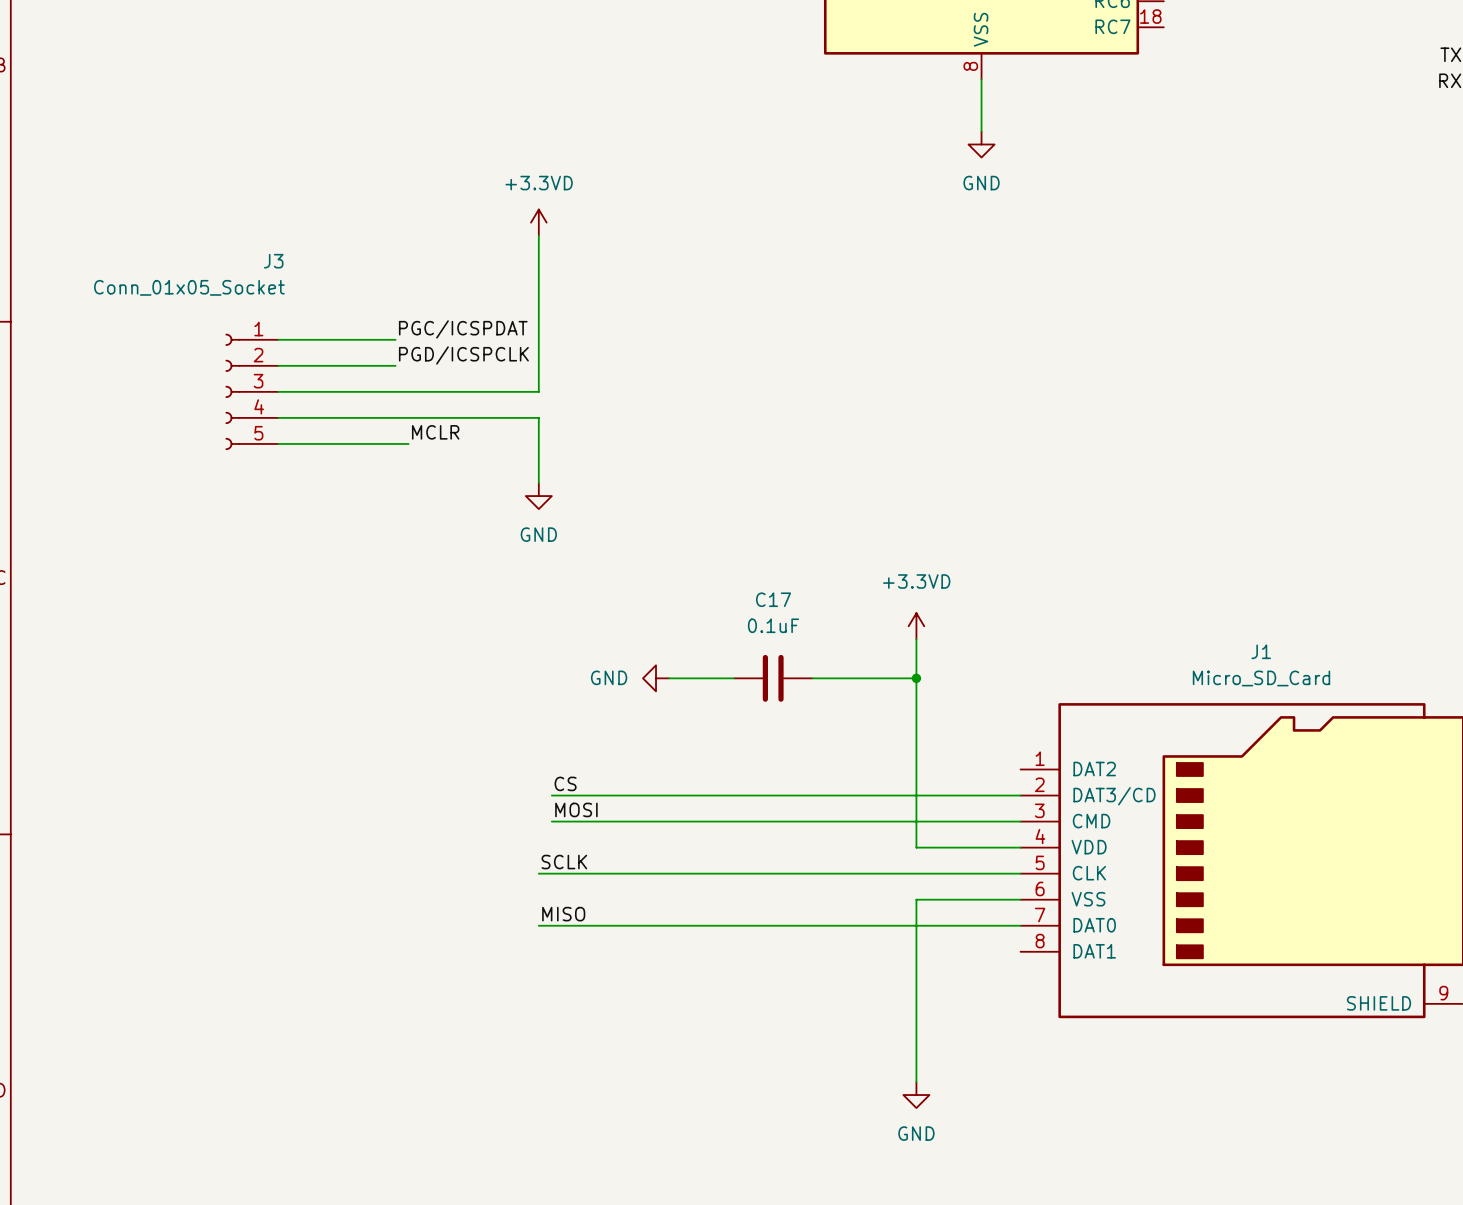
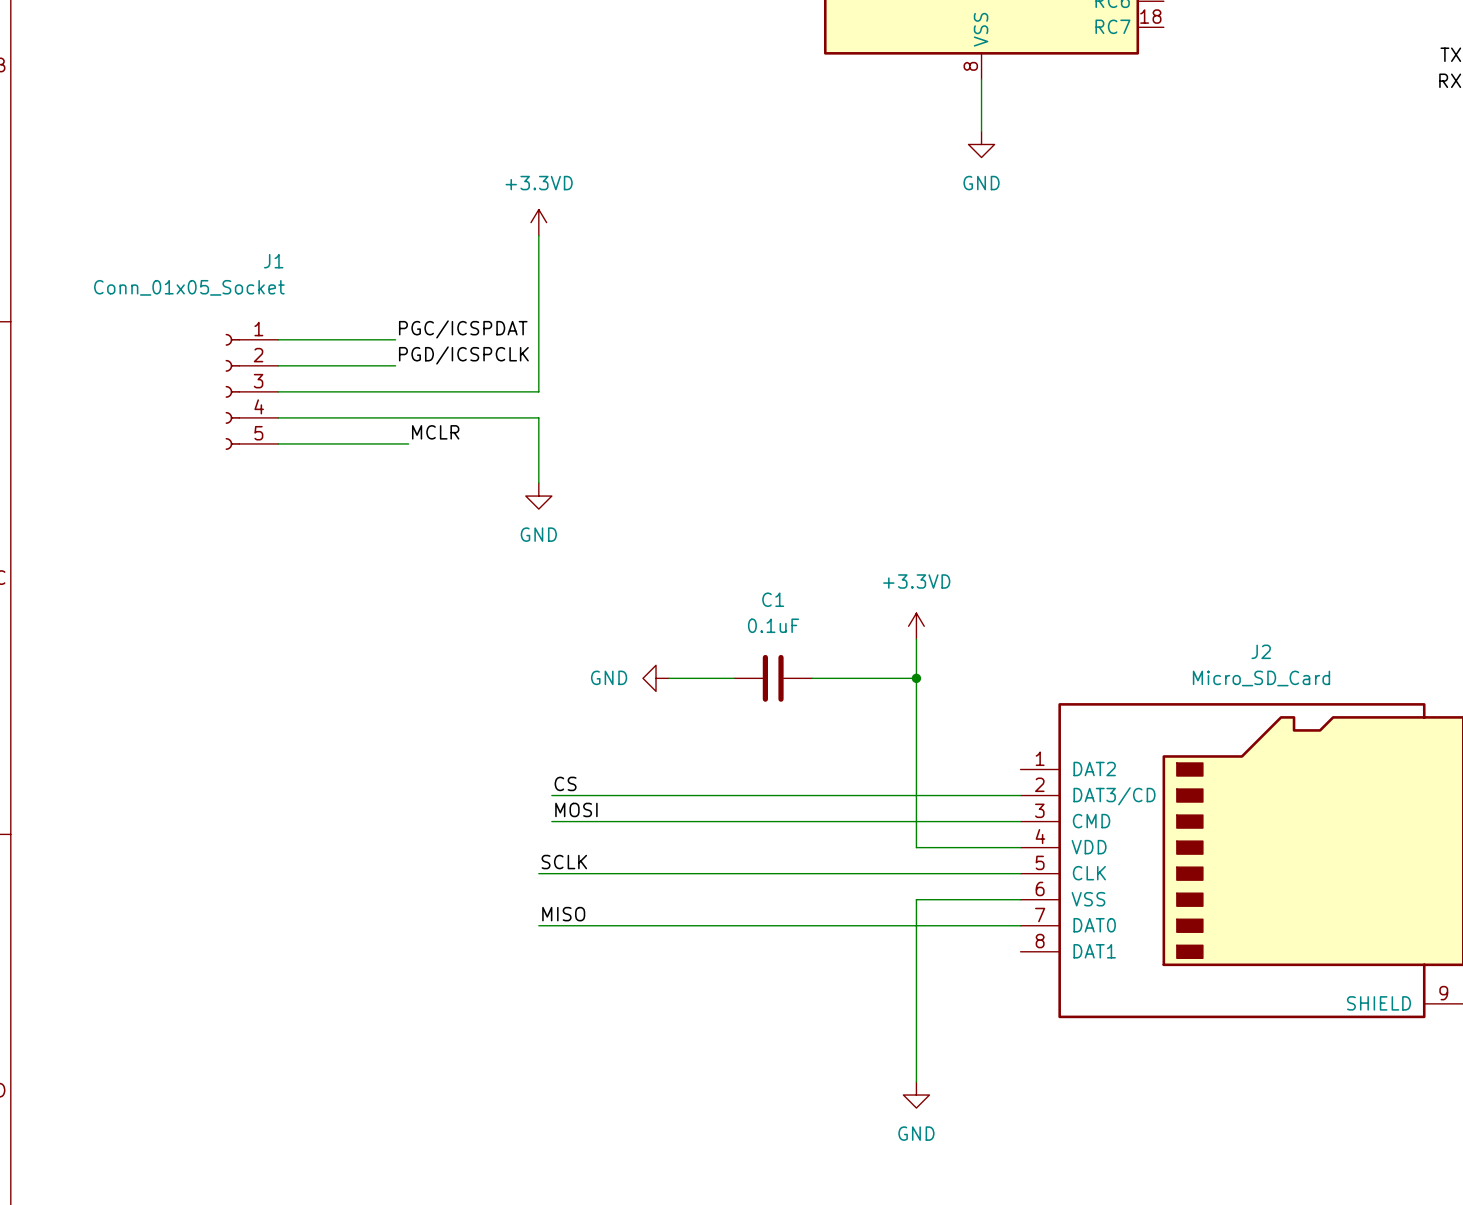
J3 name: J3 (273, 261) -> J1 (273, 261)
C17 name: C17 (773, 599) -> C1 (773, 599)
J1 name: J1 (1261, 651) -> J2 (1261, 651)

